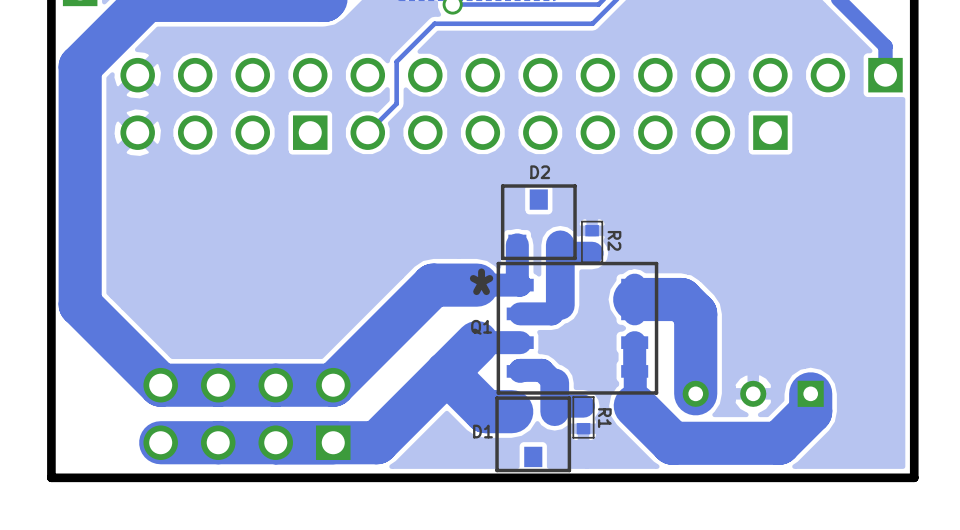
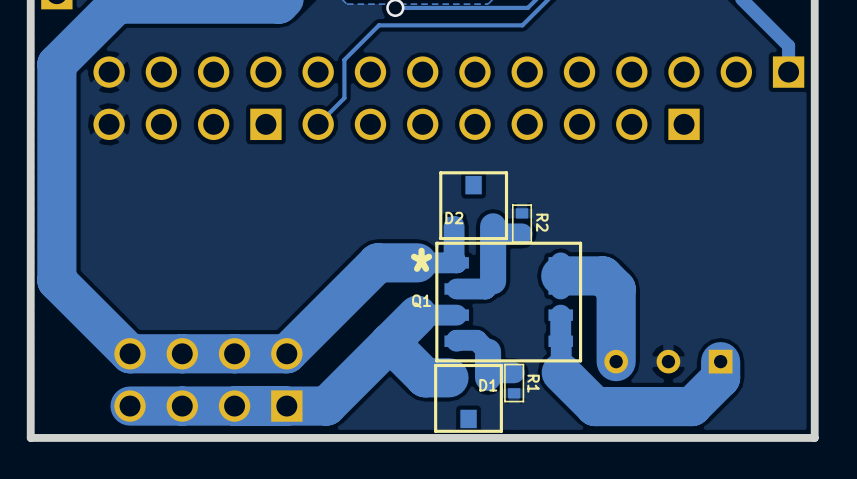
D2 name position: D2 (540, 172) -> D2 (454, 218)
D1 name position: D1 (482, 431) -> D1 (488, 385)

